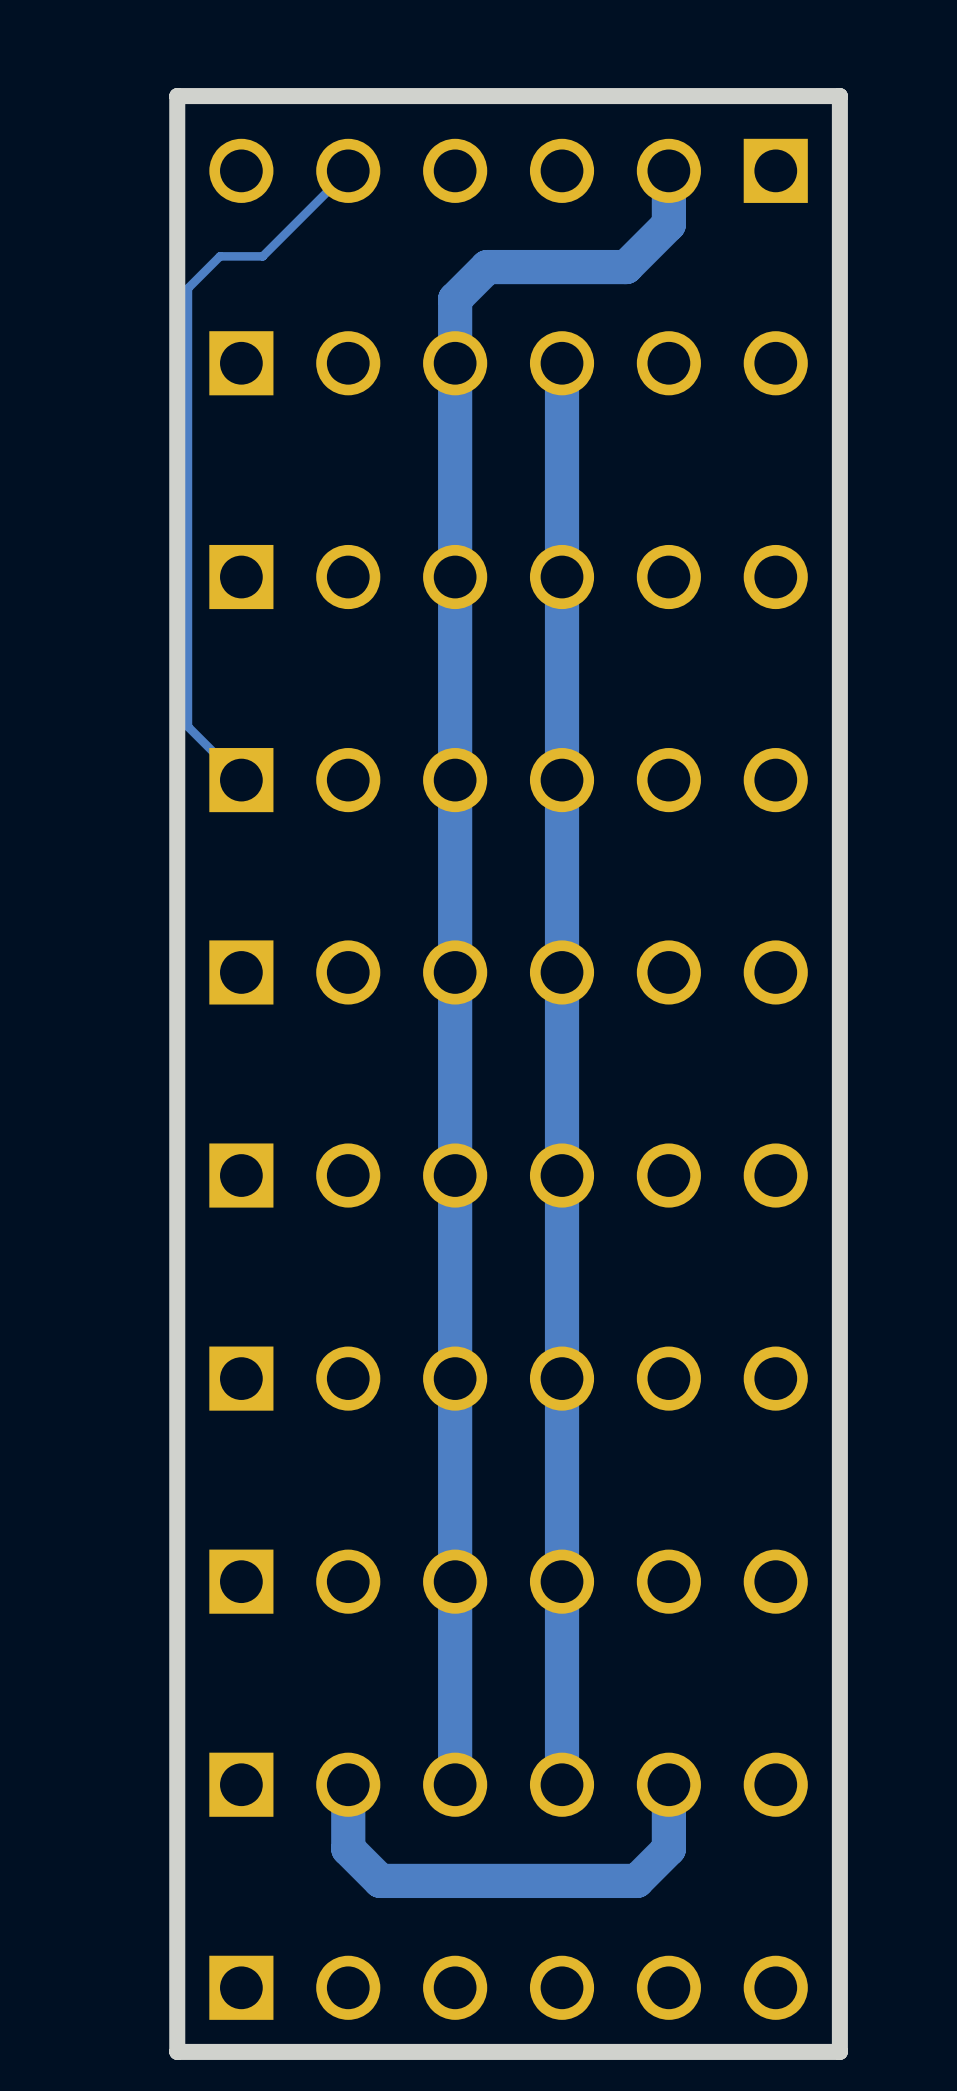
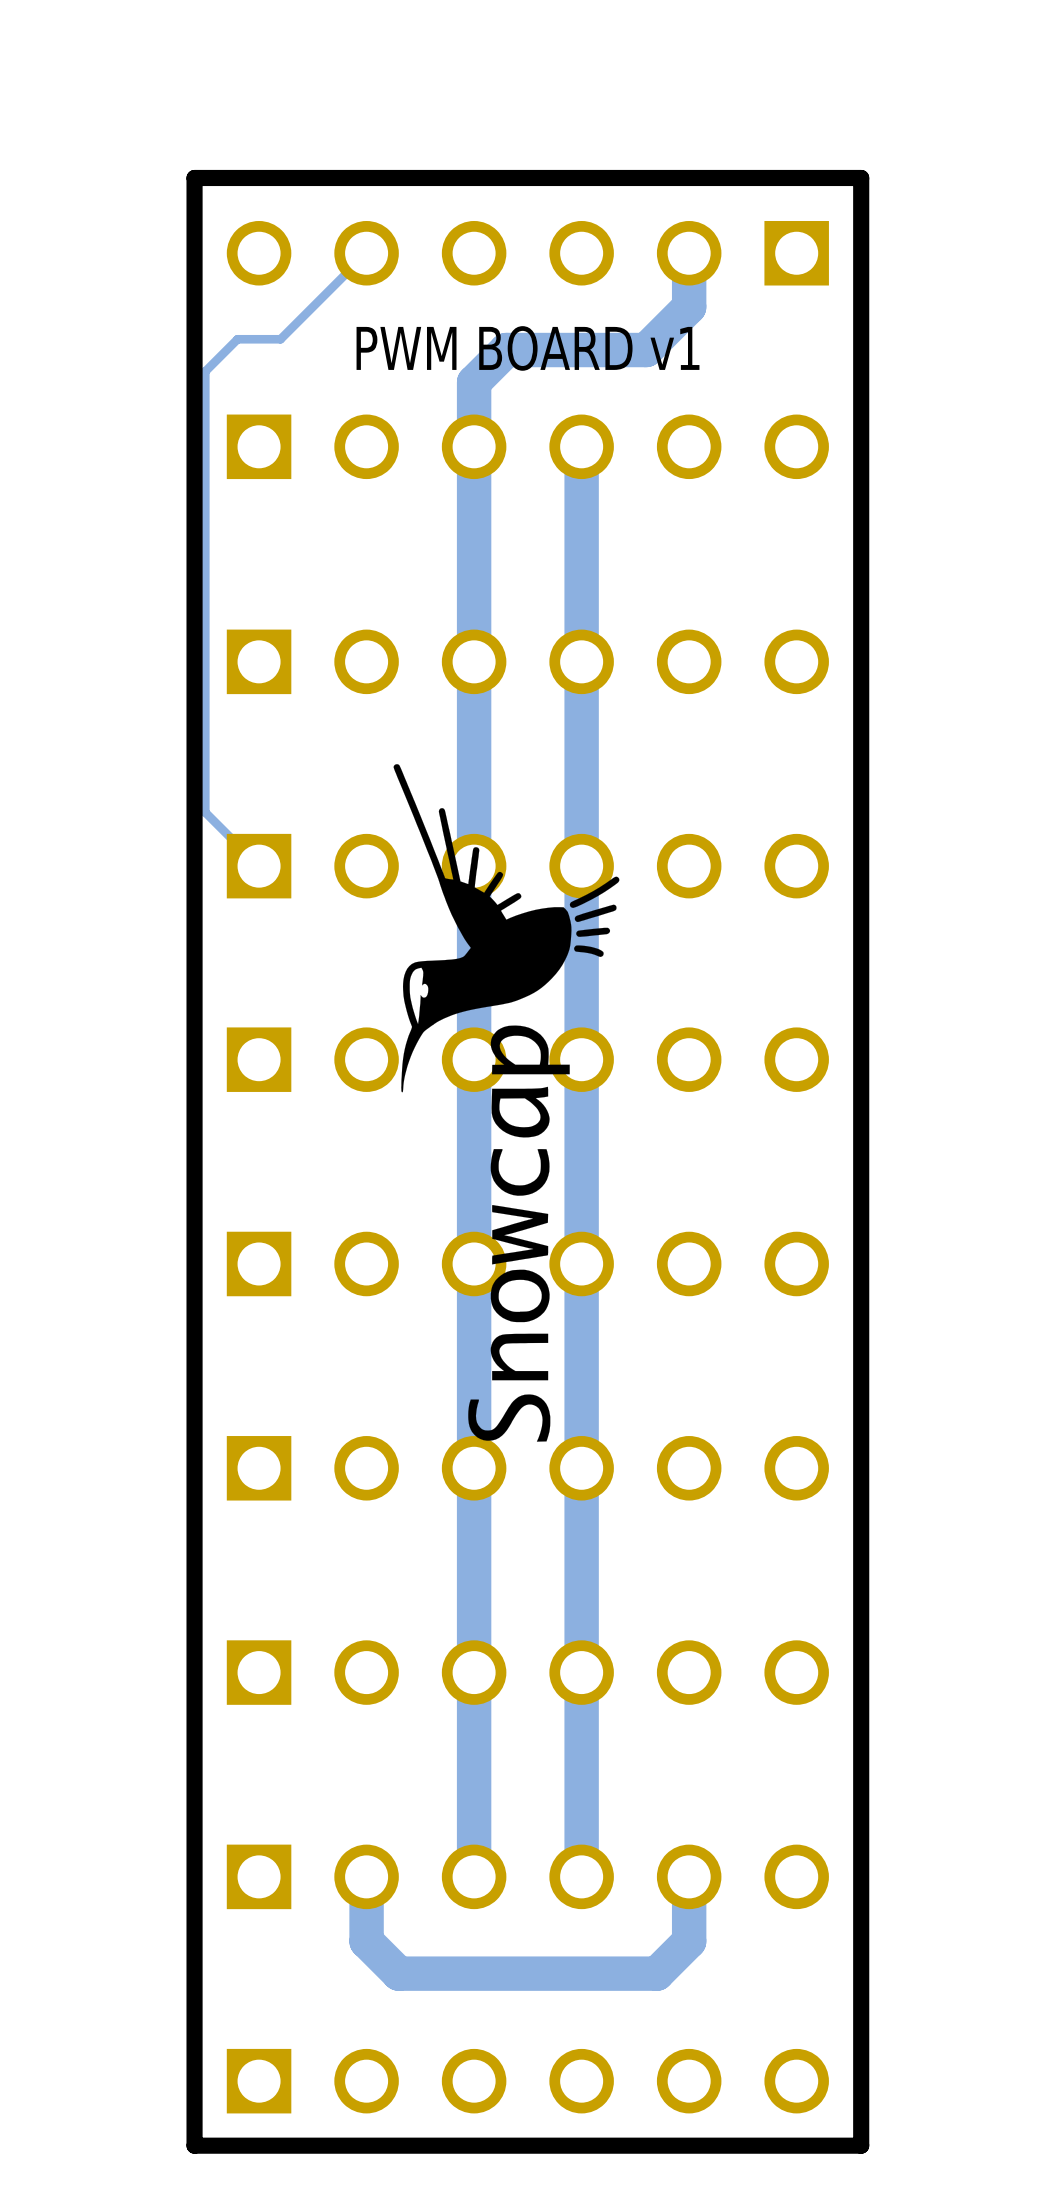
text: none -> PWM BOARD v1 (528, 348)
drawing: none -> [393, 764, 620, 1442]

